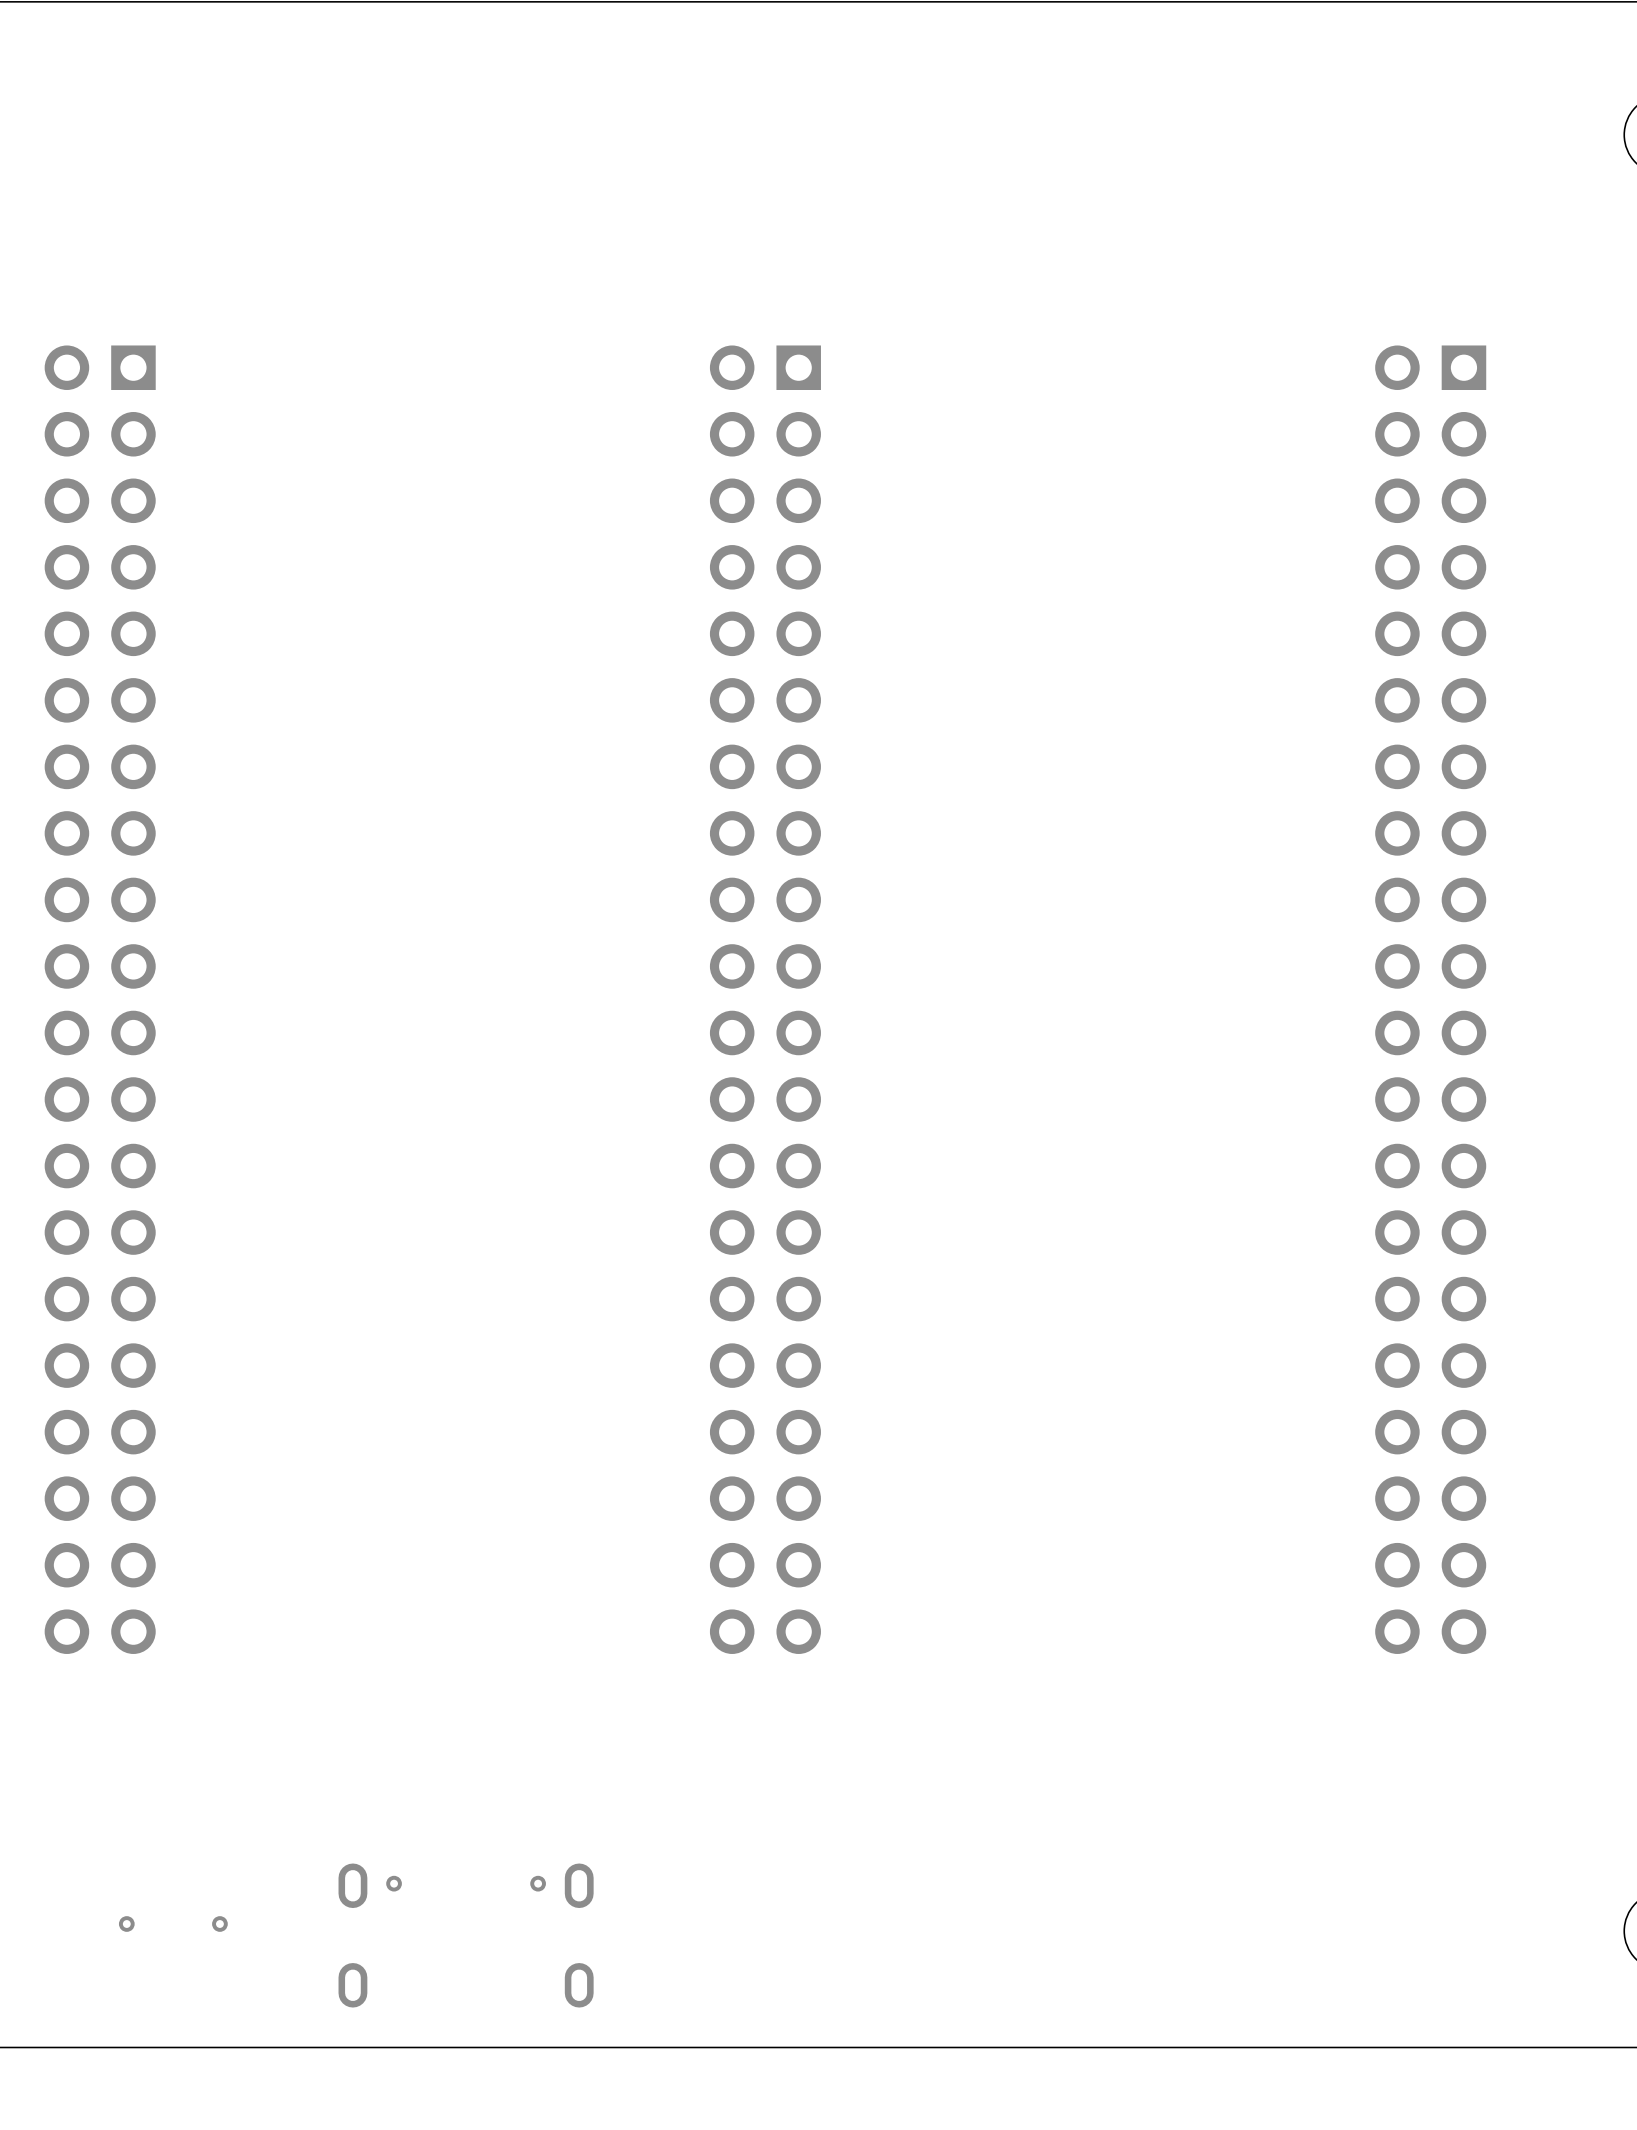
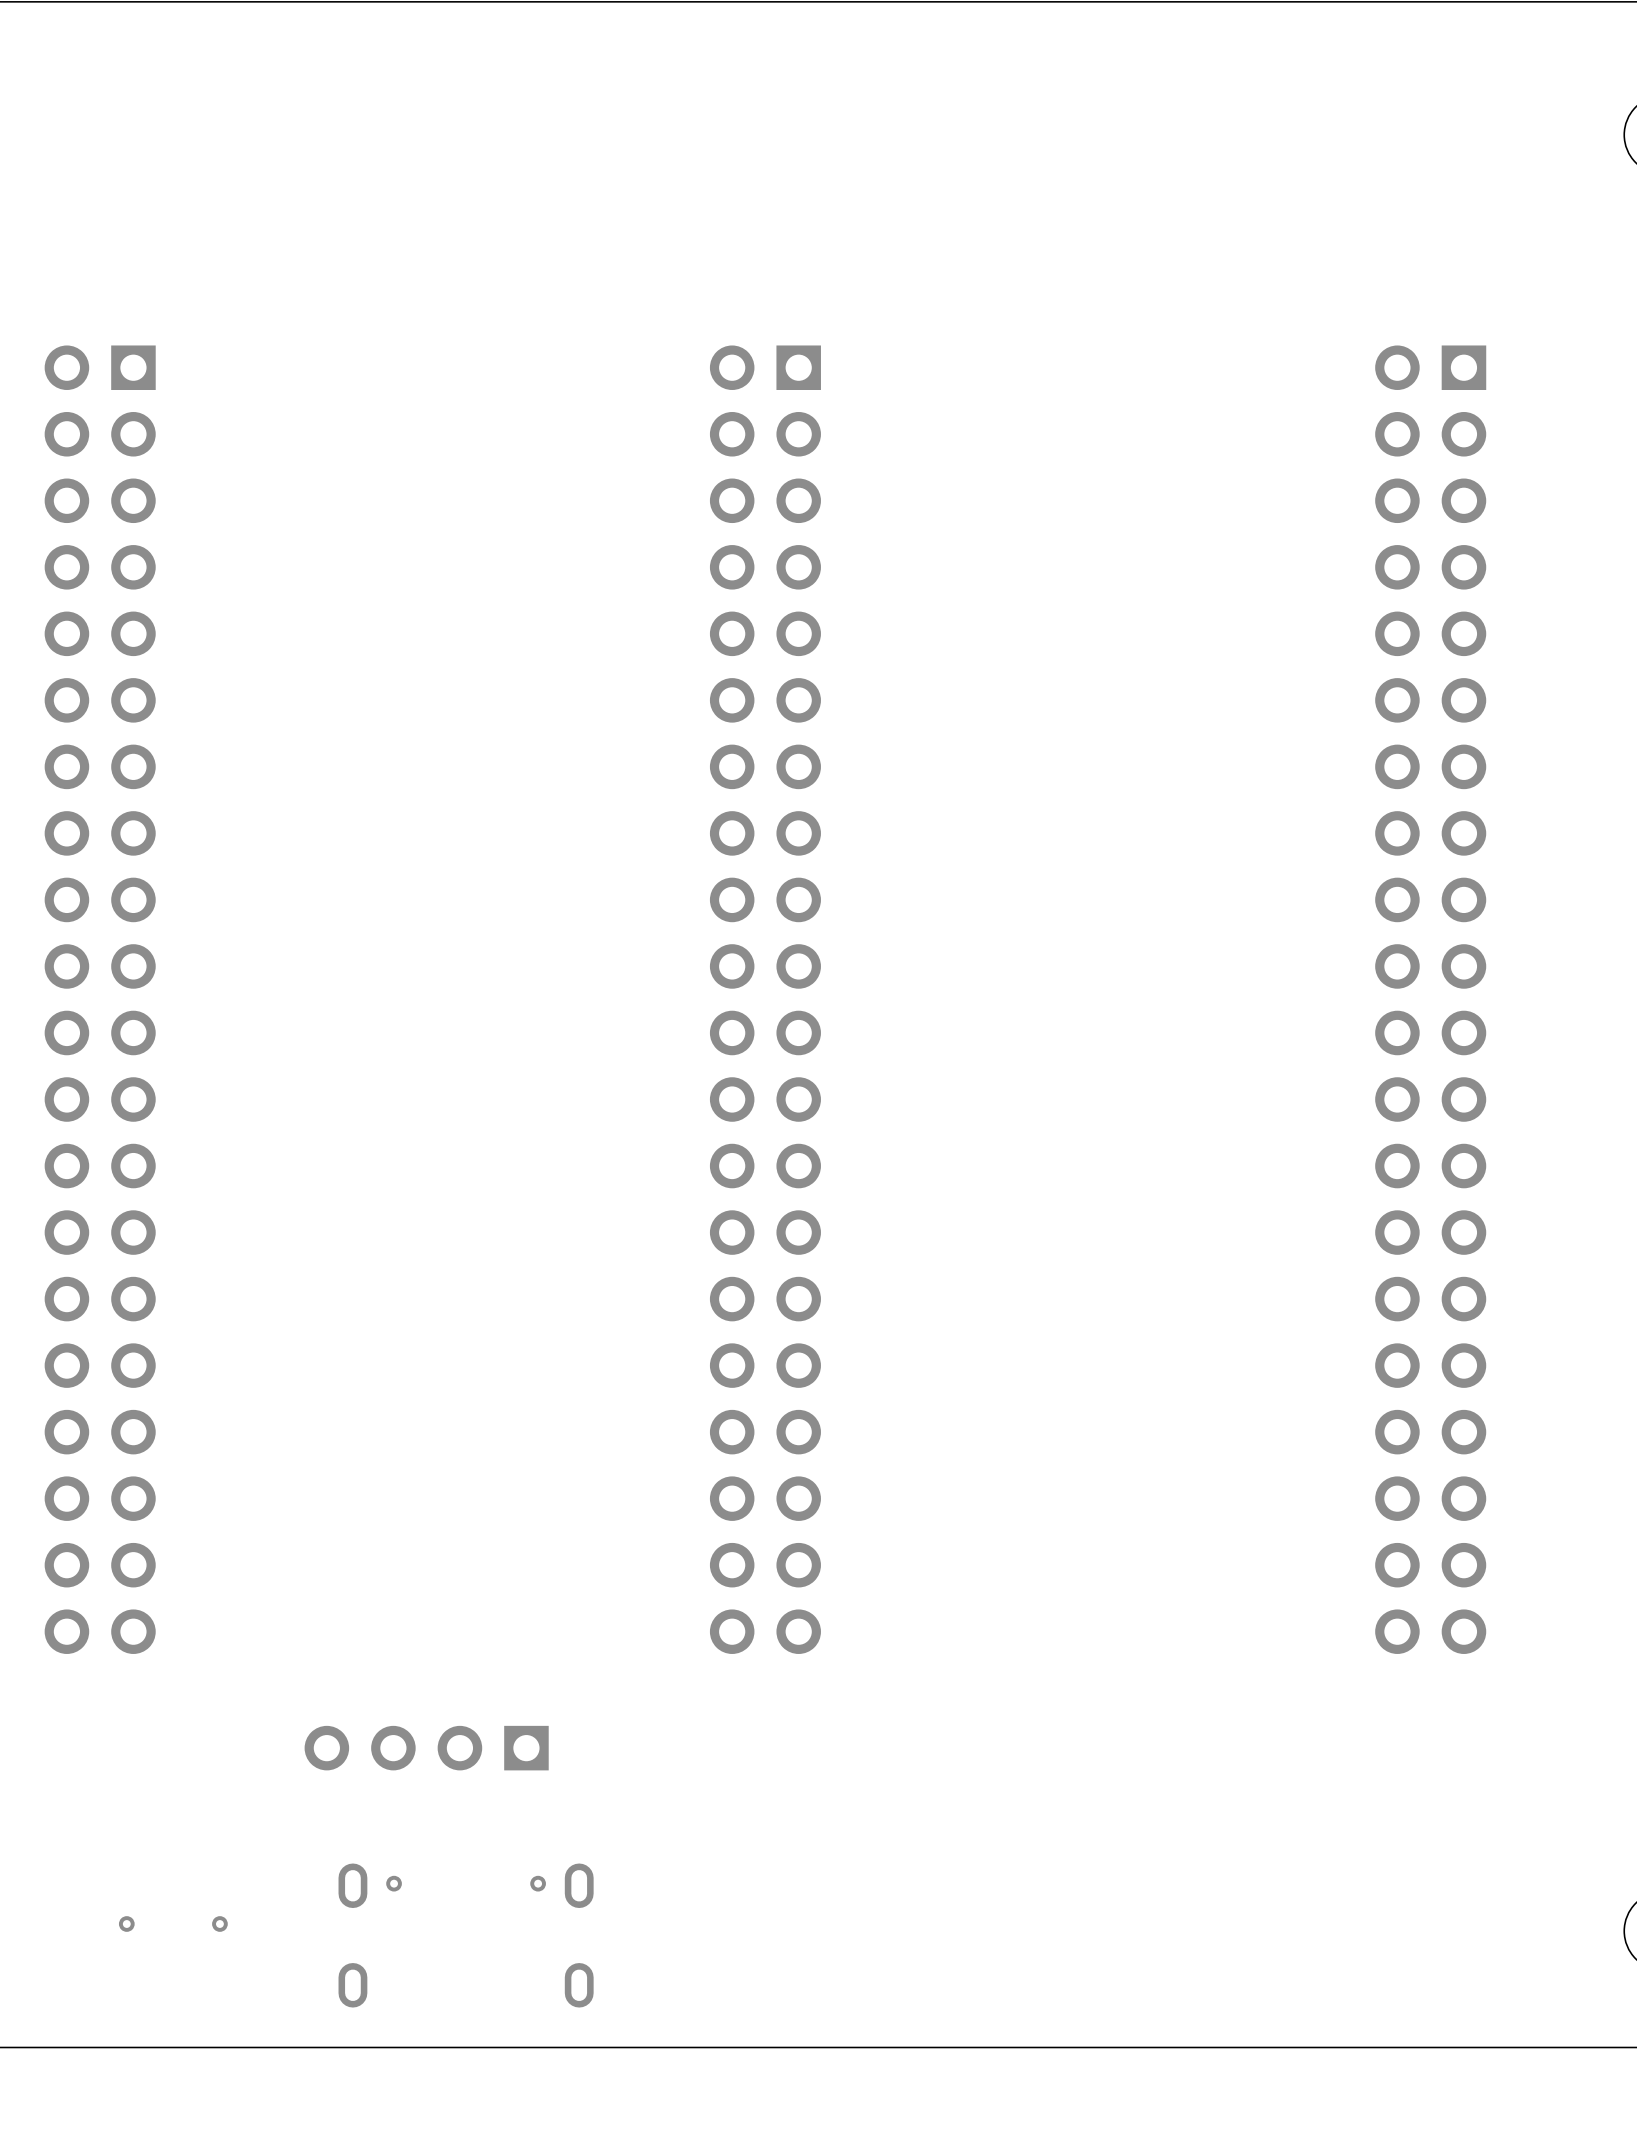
part: none -> (426, 1748)

